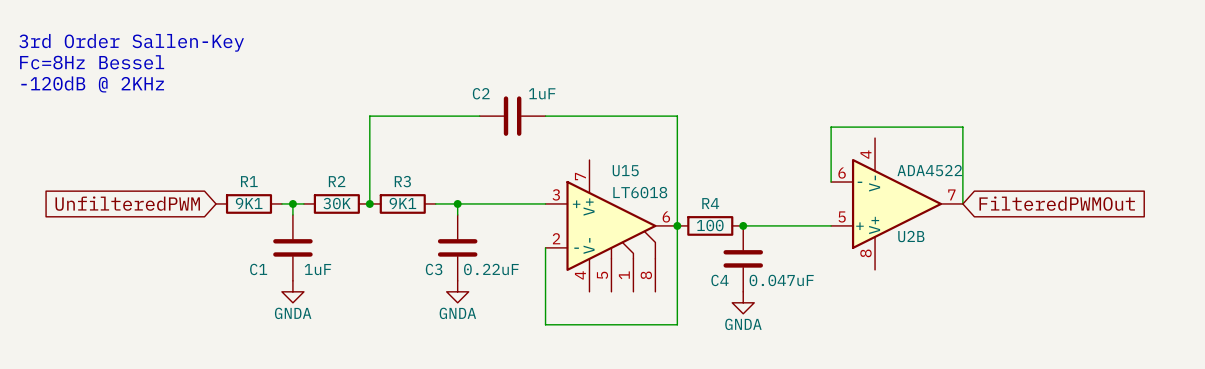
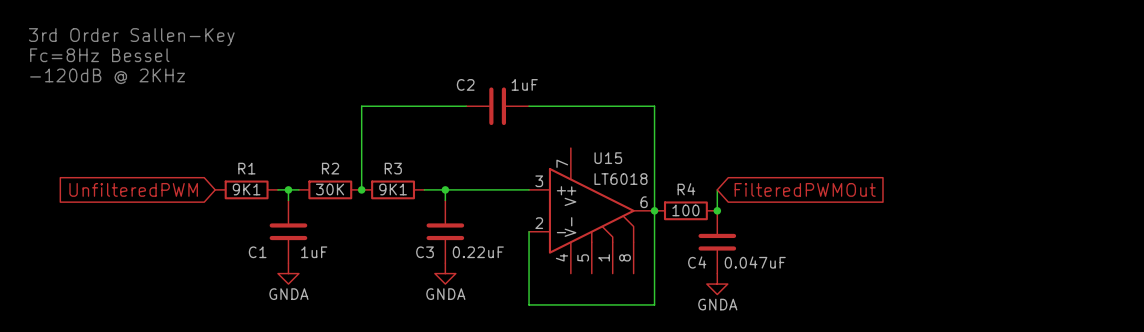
wire: (831, 182) (831, 127) (962, 127) (962, 203) -> none
global label: none -> FilteredPWMOut (805, 189)
U2B: ADA4522 (897, 203) -> none
global label: FilteredPWMOut (1057, 203) -> none
wire: (743, 225) (831, 225) -> (717, 210) (717, 189)

